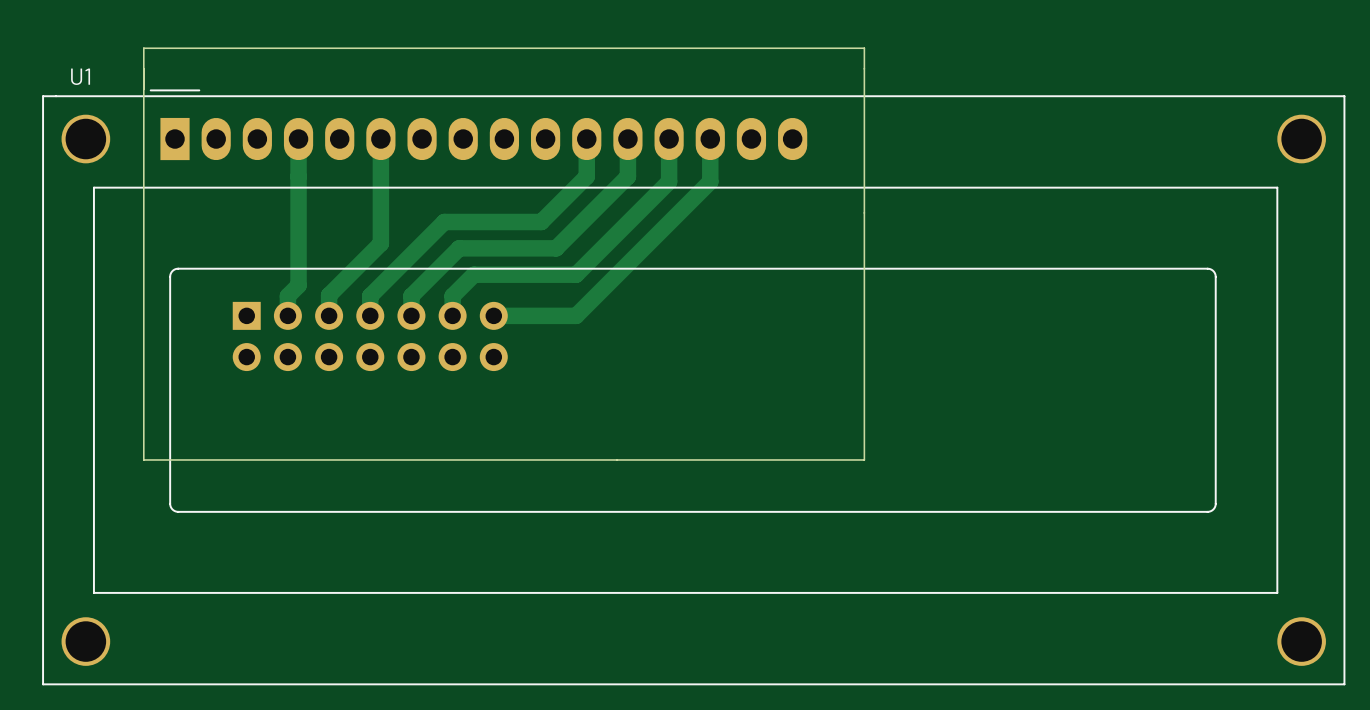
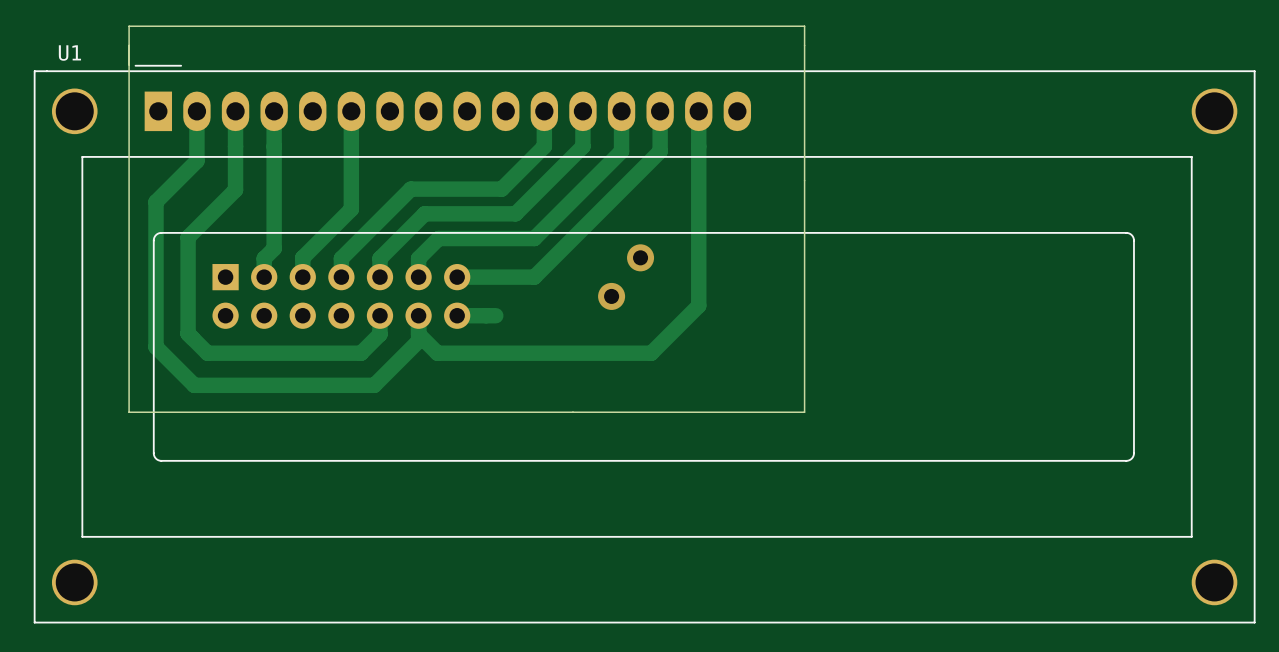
track: none -> (196, 111) (196, 161) (155, 201) (155, 347) (194, 385) (374, 385) (418, 341) (418, 315)
track: none -> (235, 111) (235, 189) (188, 237) (188, 333) (207, 353) (361, 353) (379, 334) (379, 315)
track: none -> (698, 111) (698, 305) (651, 353) (437, 353) (418, 334)
via: none -> (640, 257)
via: none -> (611, 296)
track: none -> (457, 315) (495, 315)

